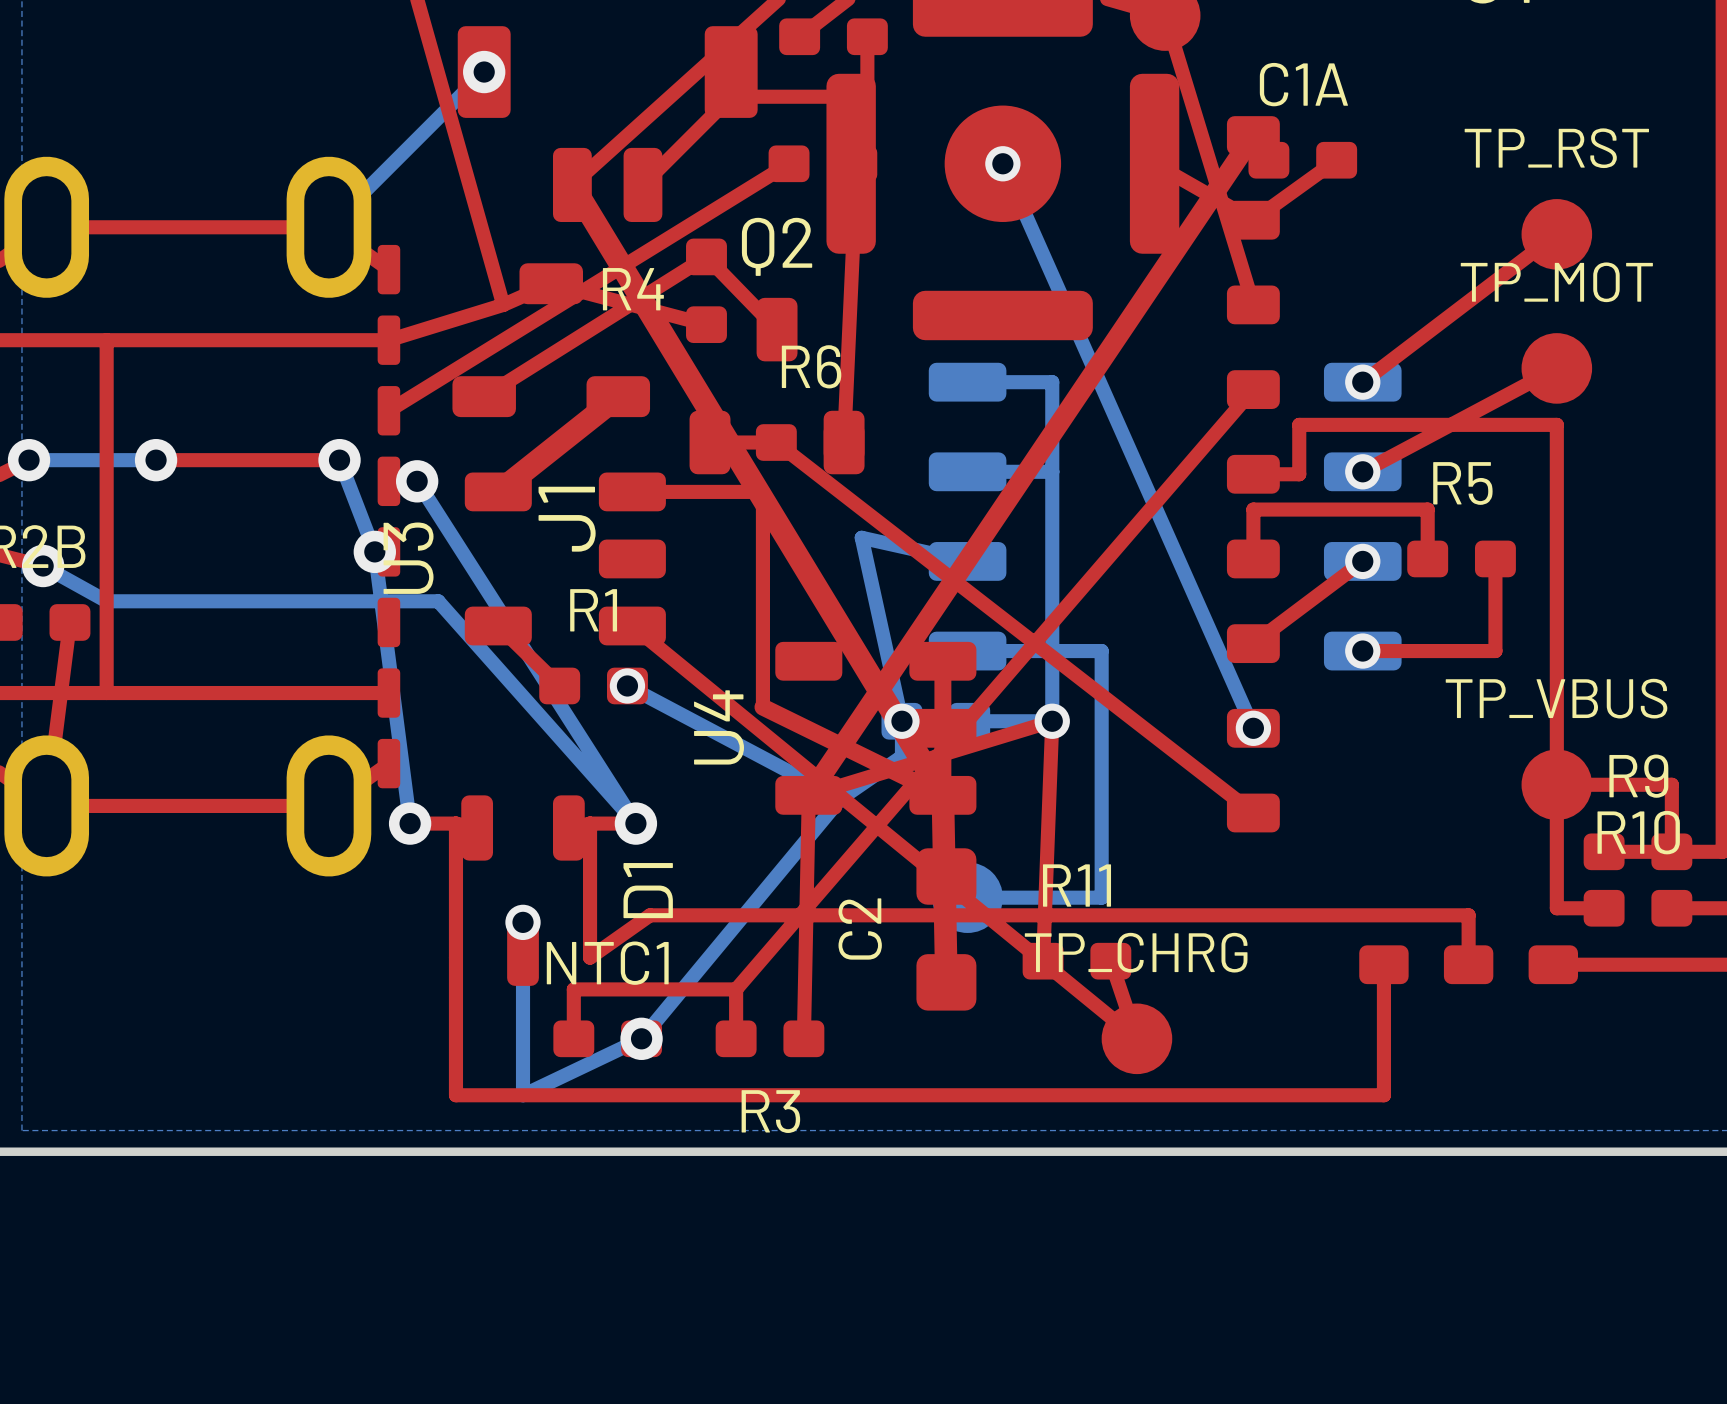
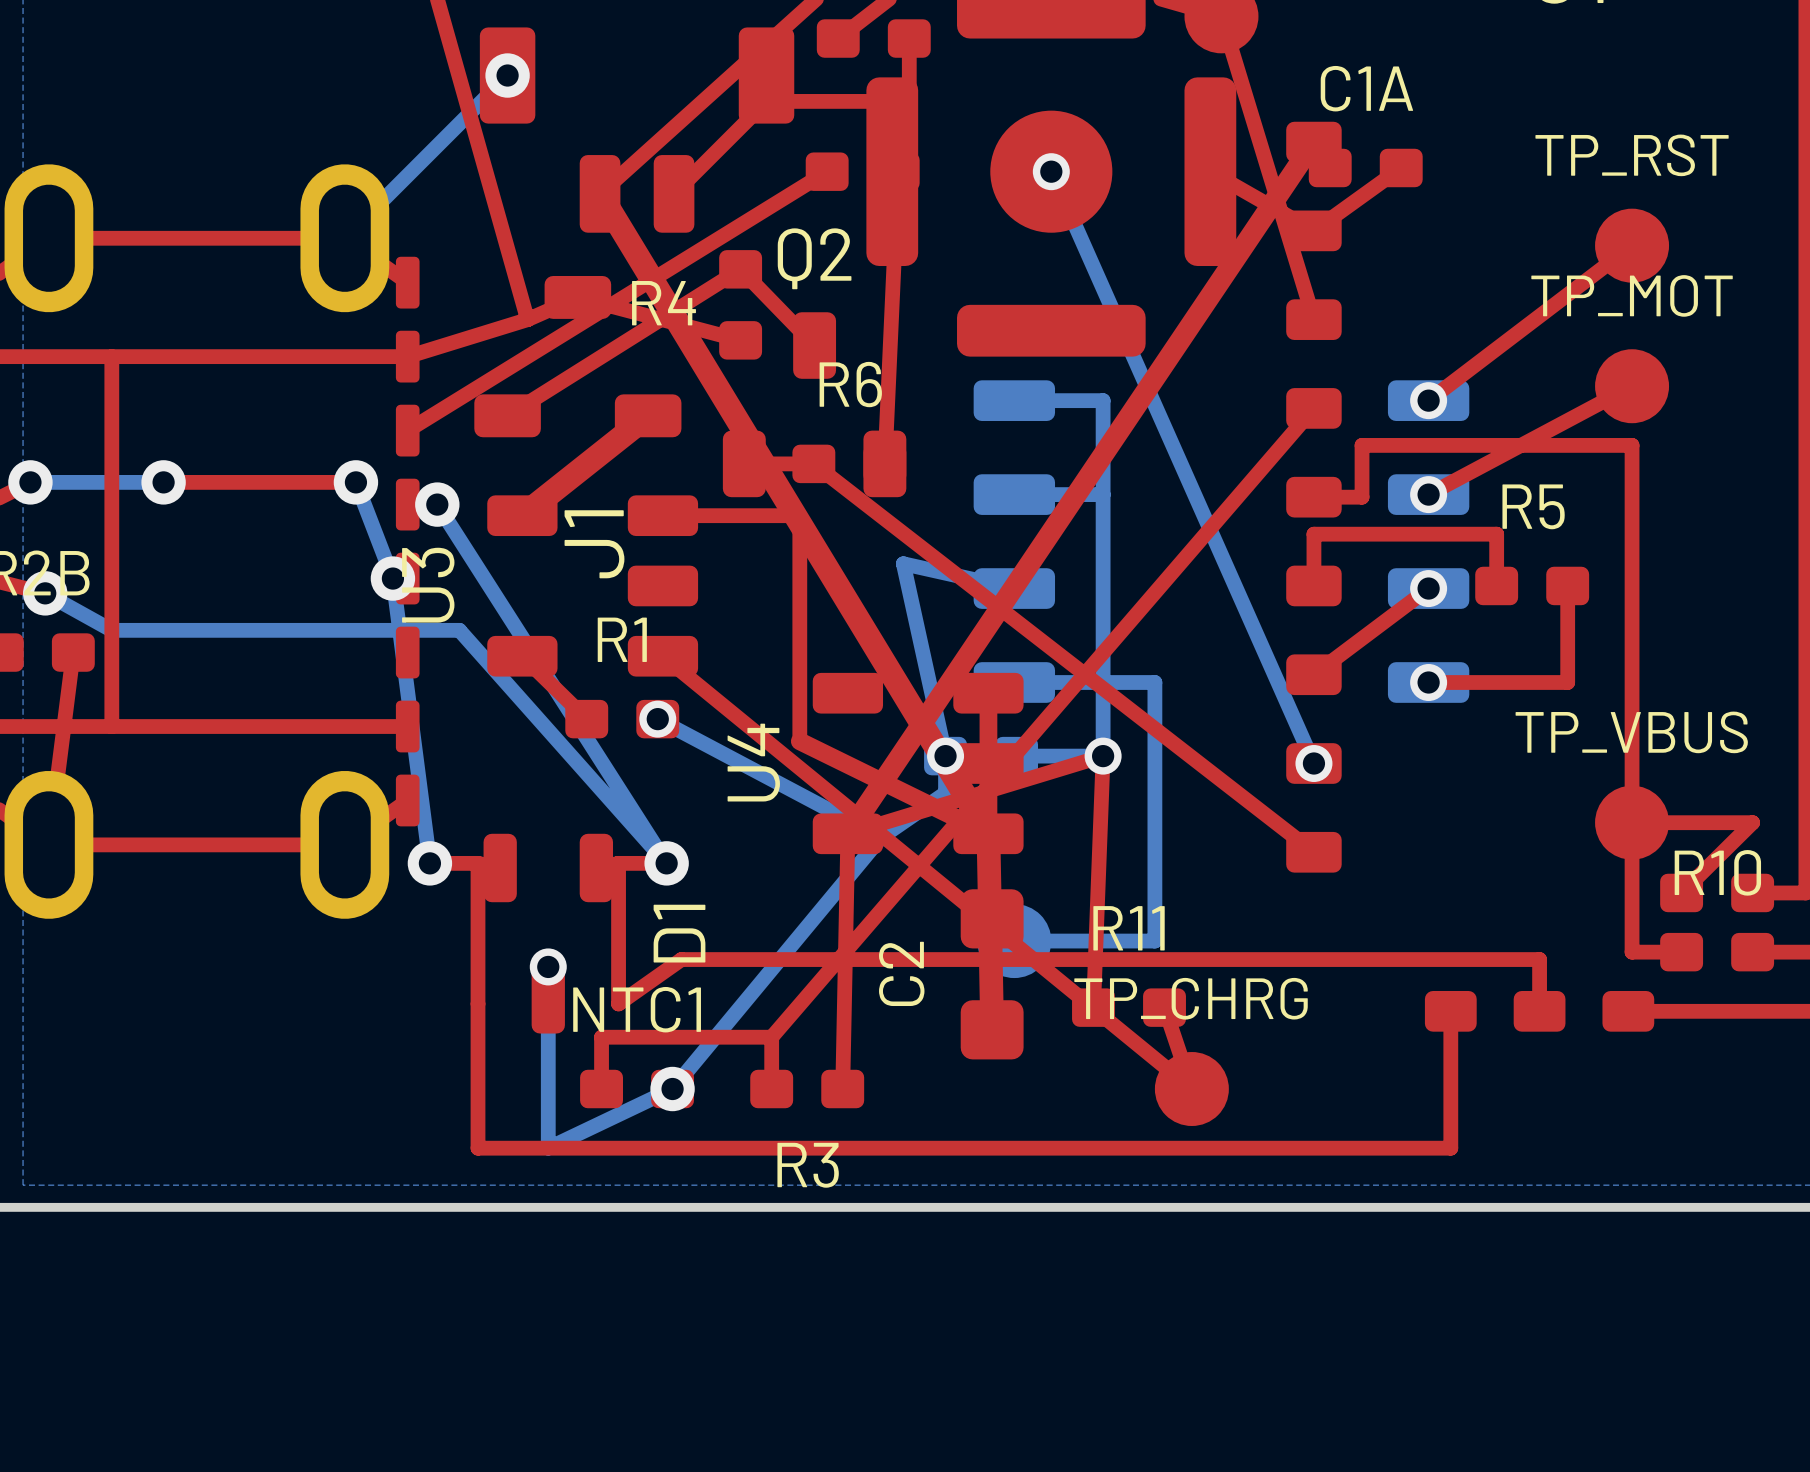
R9 name: R9 (1638, 776) -> none
top track: (1671, 784) (1671, 851) (1604, 851) -> (1752, 822) (1681, 892)

